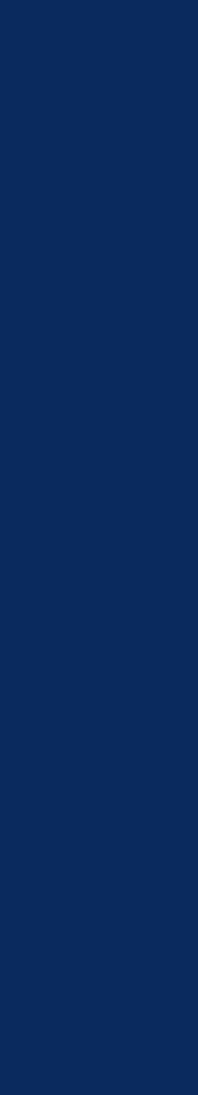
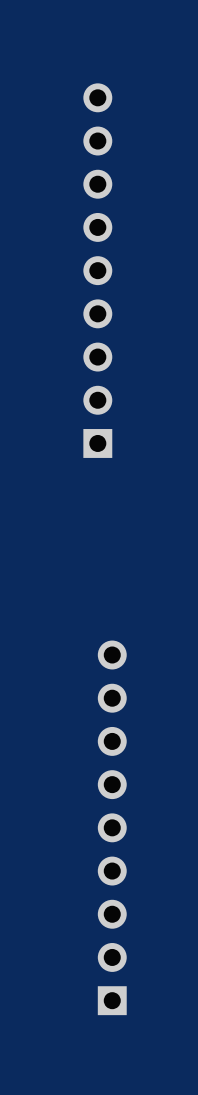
part: none -> (97, 270)
part: none -> (112, 827)

